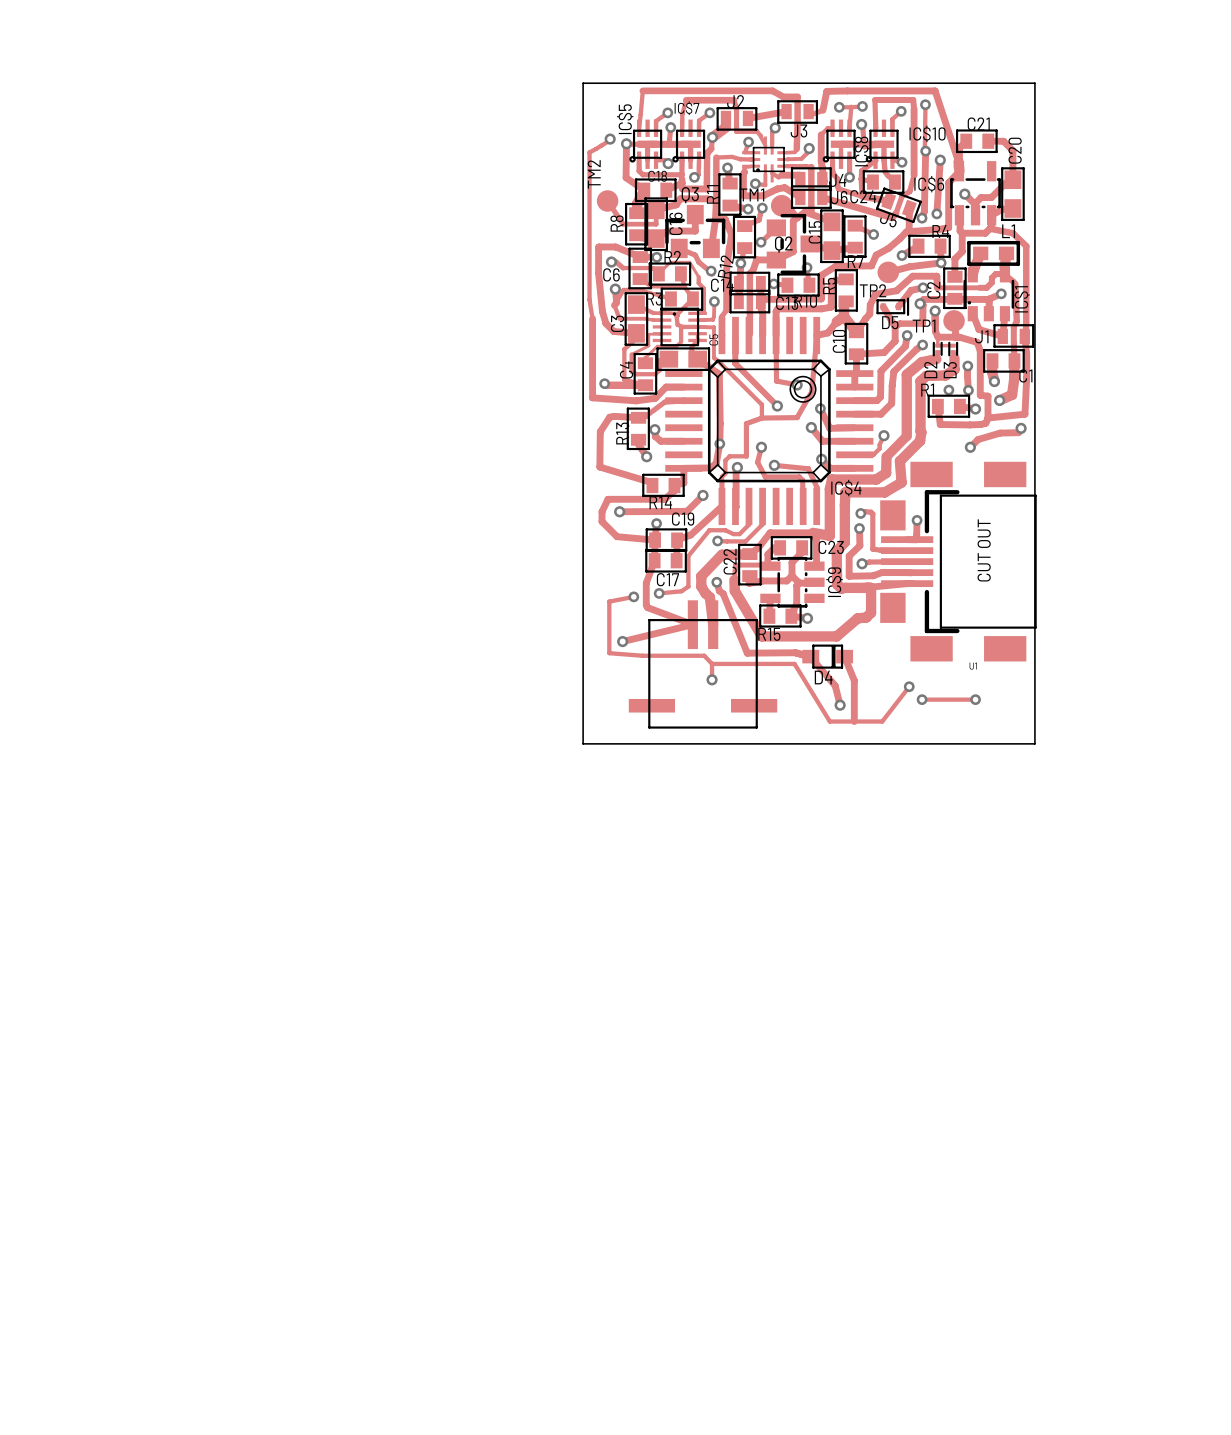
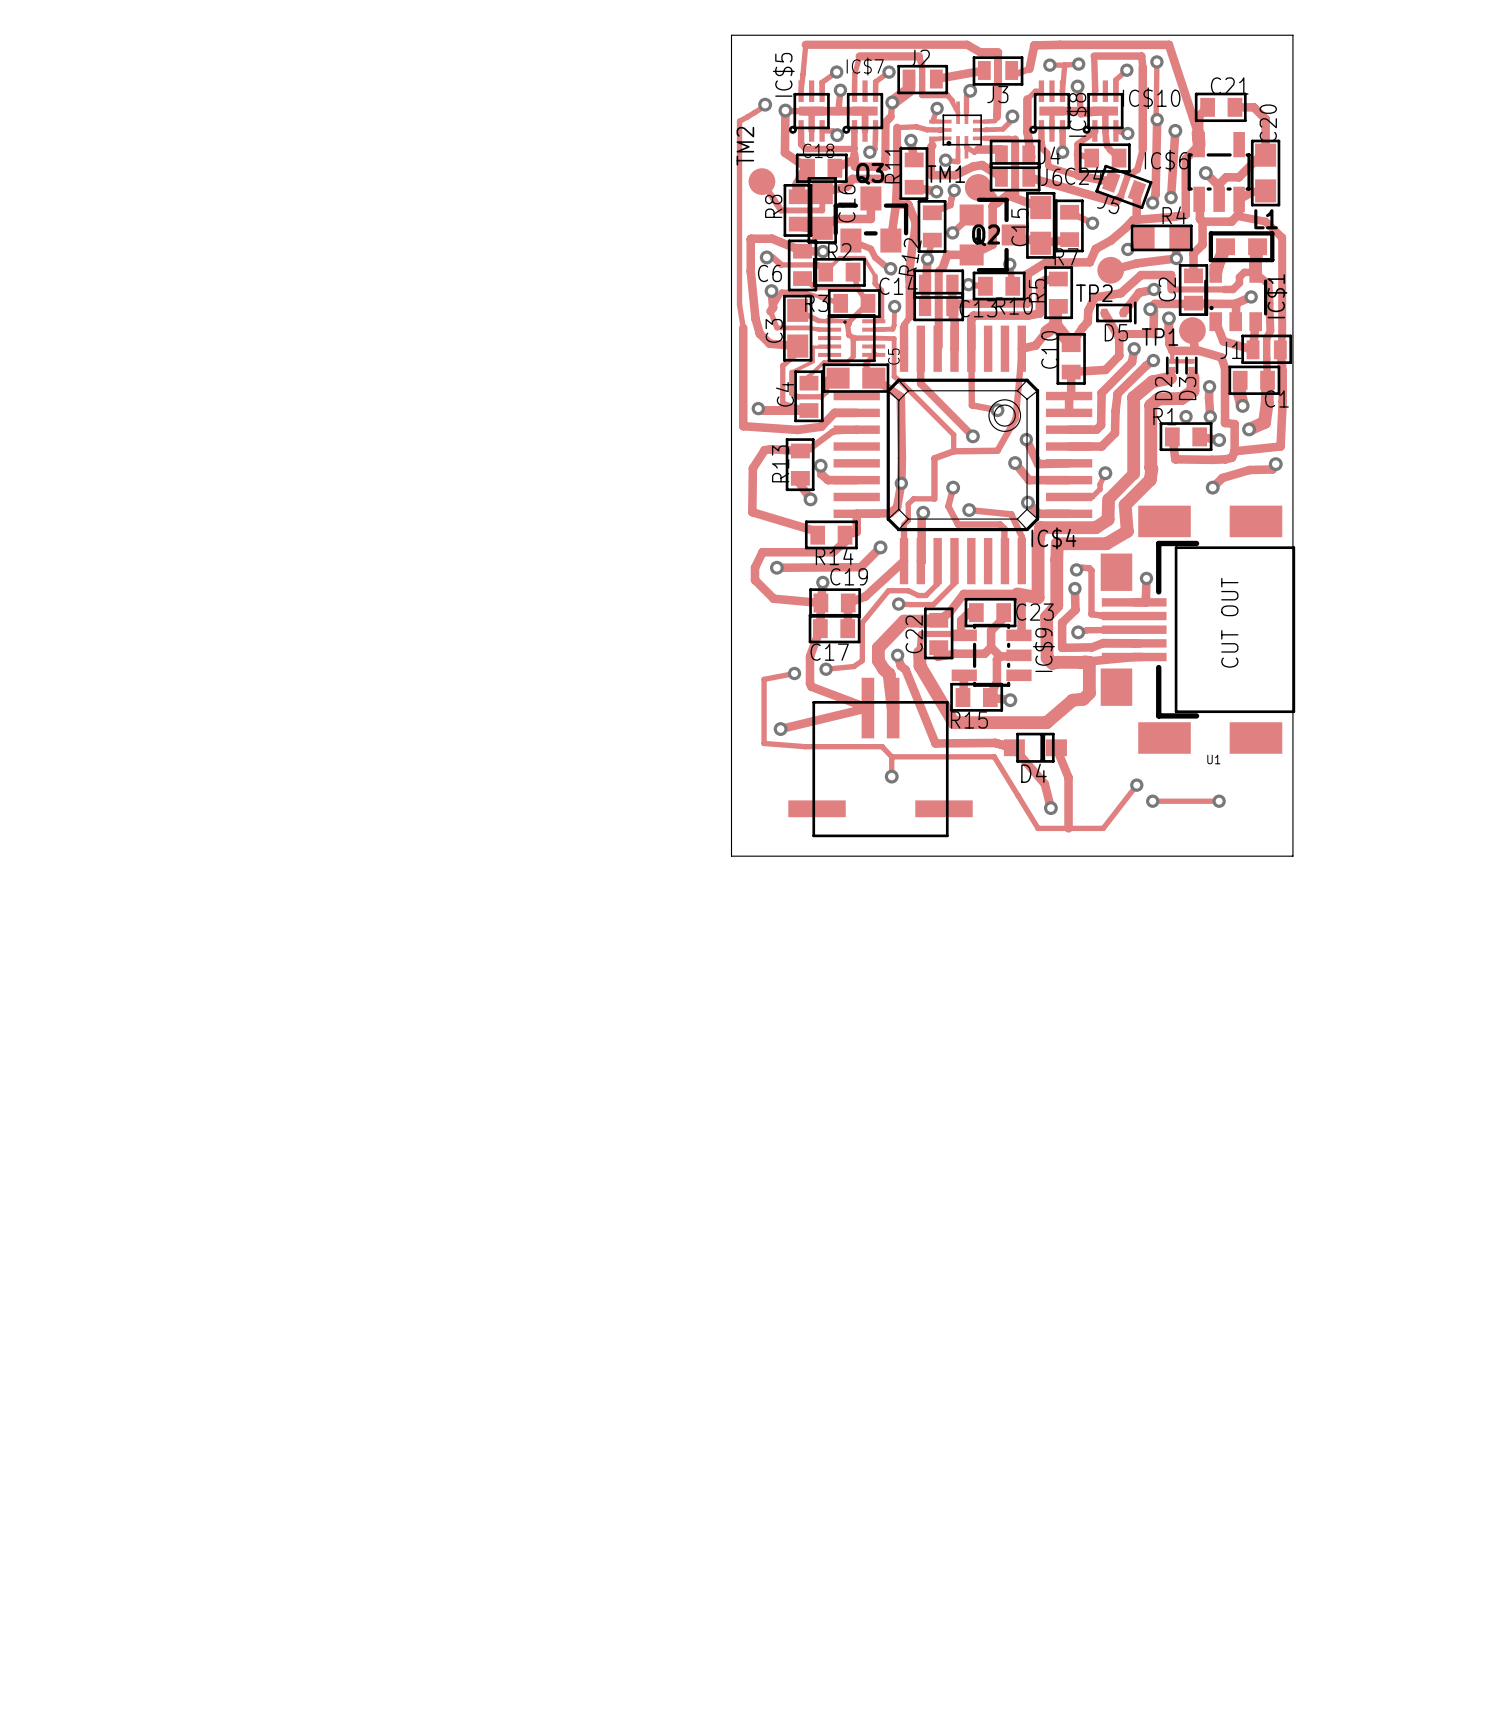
R4 footprint: [908, 234, 951, 258] -> [1133, 226, 1191, 250]
line: none -> (1132, 225) (1132, 249) (1191, 249)
line: none -> (1132, 225) (1191, 225) (1191, 249)

